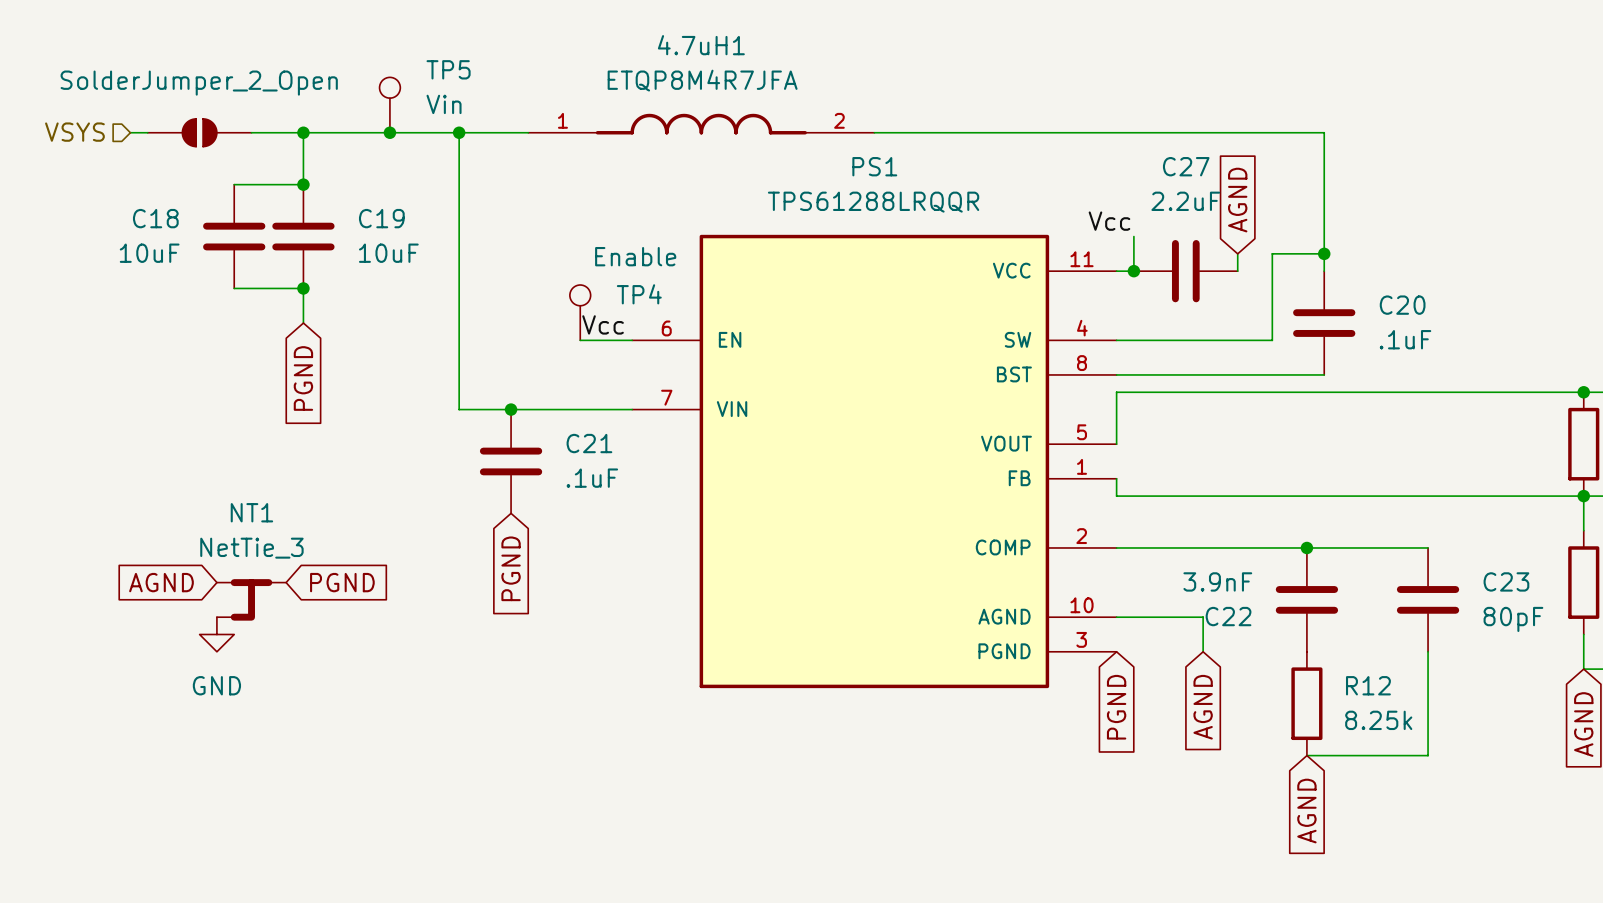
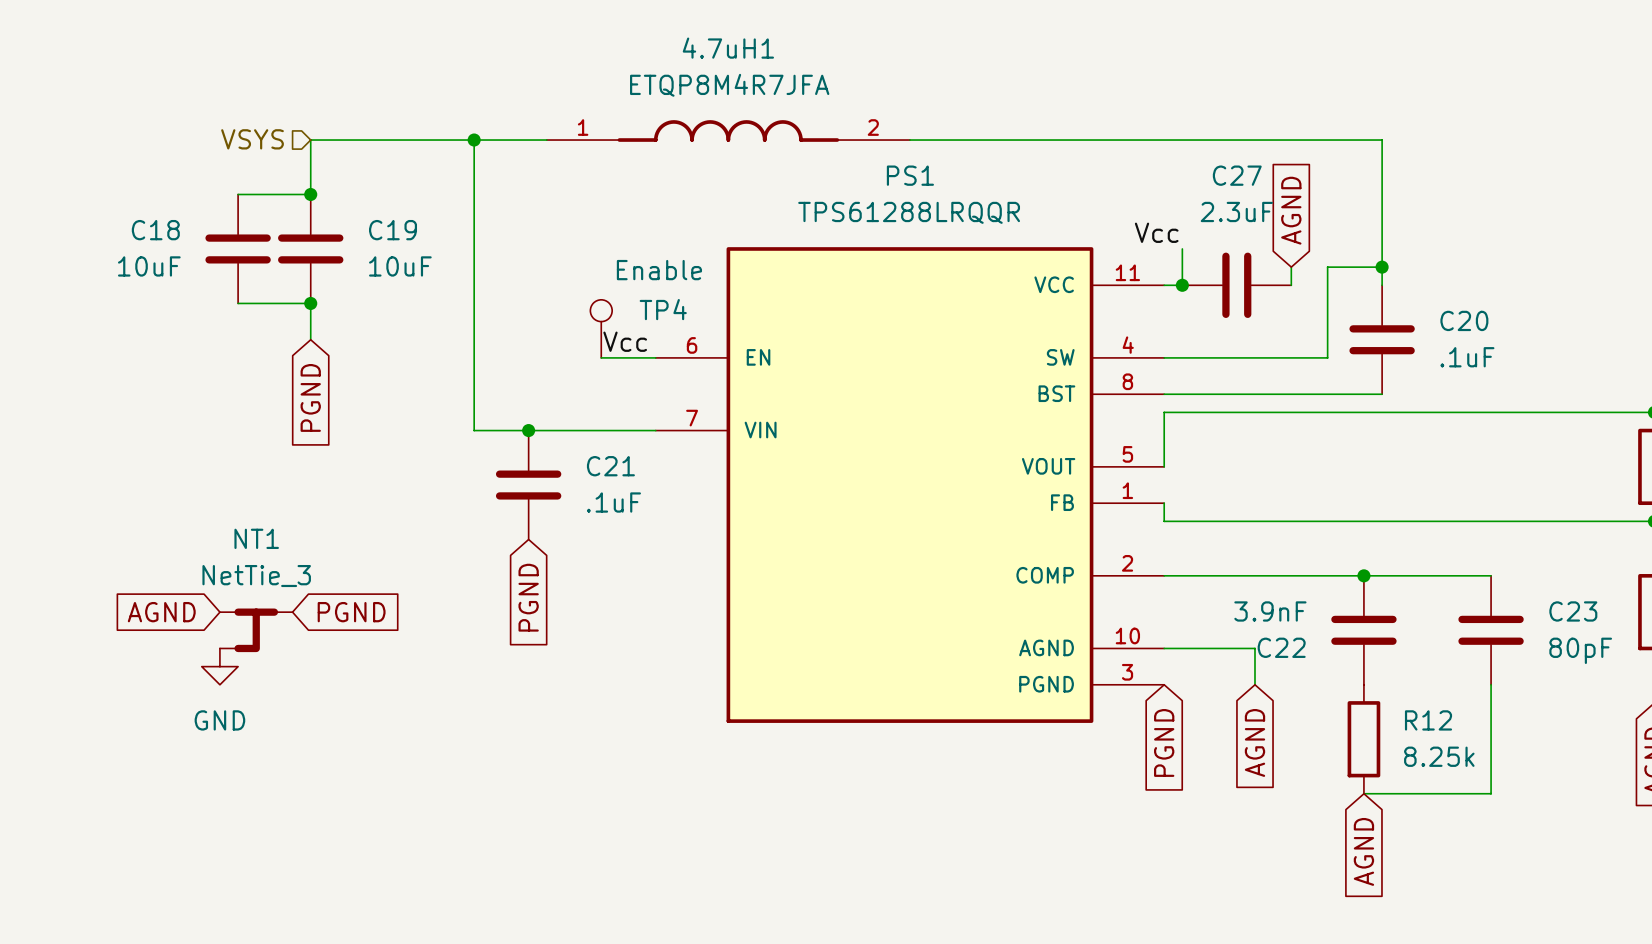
TP5: Vin (389, 105) -> none
hierarchical label position: VSYS (74, 132) -> VSYS (252, 139)
wire: (130, 132) (147, 132) -> none
part: SolderJumper_2_Open (199, 132) -> none
wire: (251, 132) (303, 132) -> none
junction: (303, 132) -> none
junction: (389, 132) -> none
C27 value: 2.2uF (1185, 201) -> 2.3uF (1236, 211)

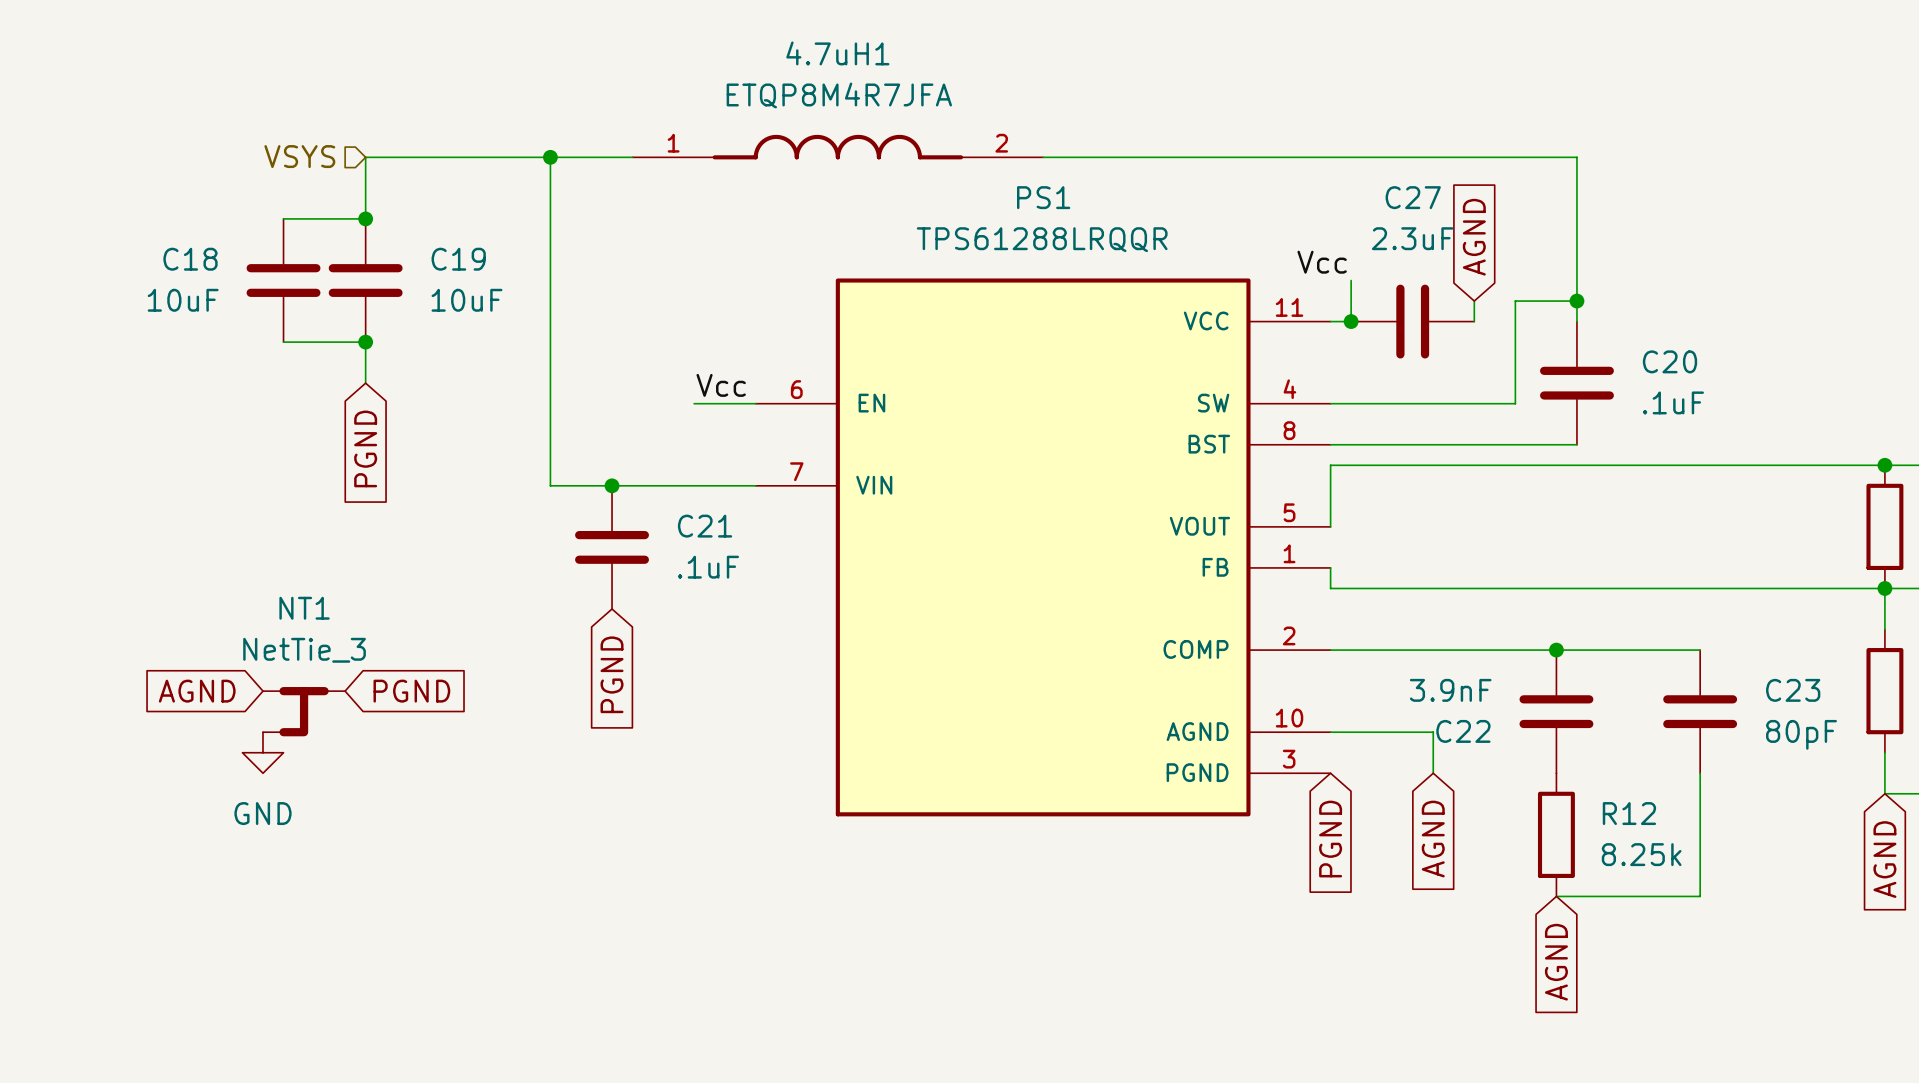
TP4: Enable (601, 328) -> none

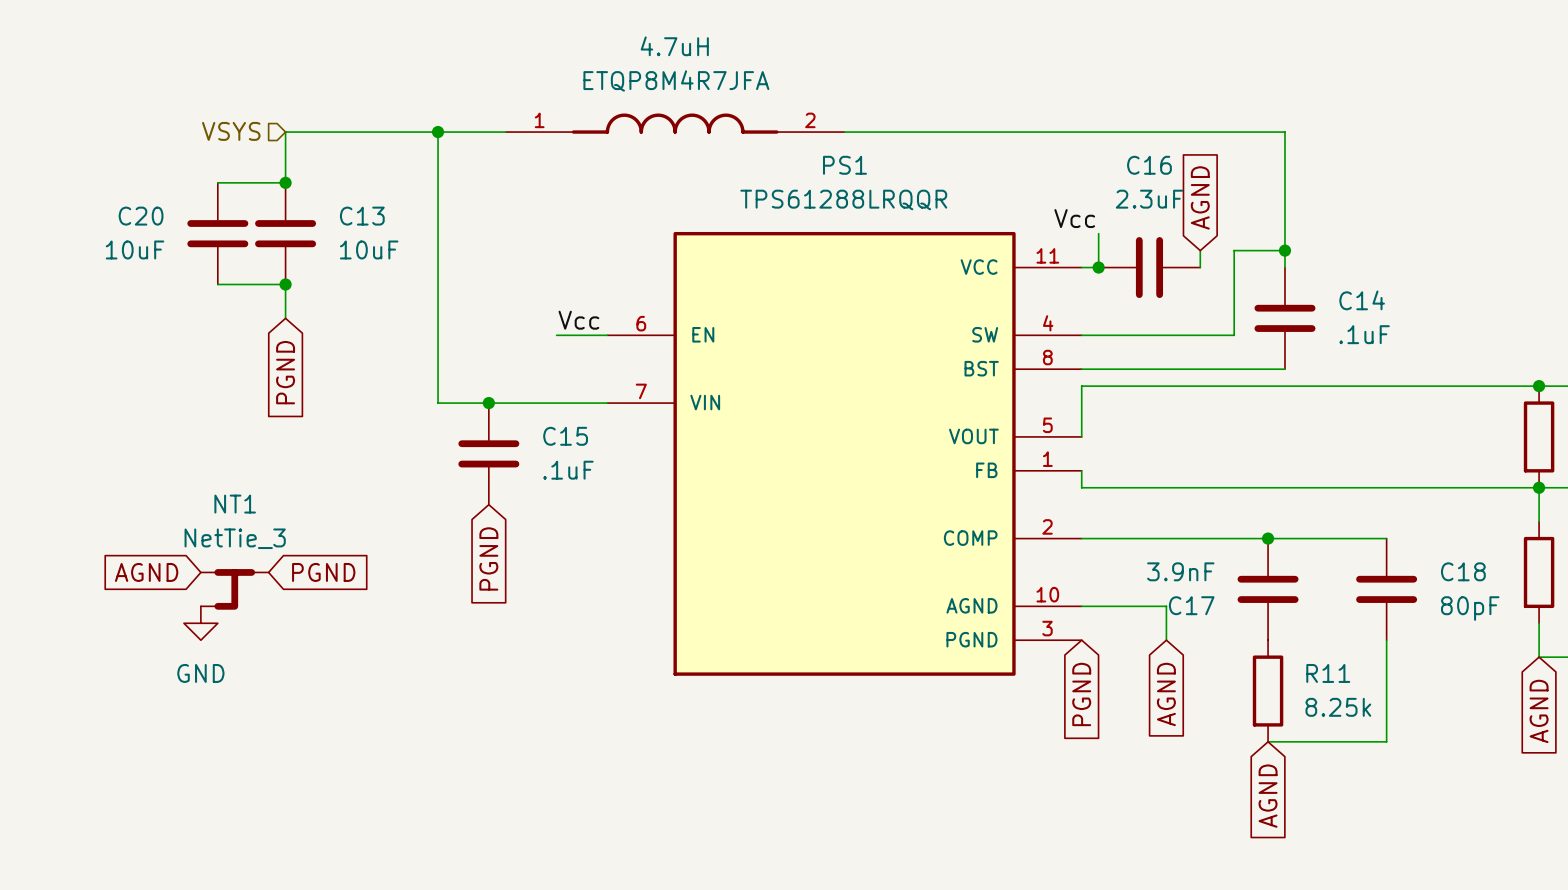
4.7uH1 name: 4.7uH1 (837, 53) -> 4.7uH (674, 46)
C27 name: C27 (1413, 197) -> C16 (1149, 165)
C18 name: C18 (190, 259) -> C20 (141, 216)
C19 name: C19 (458, 259) -> C13 (362, 216)
C20 name: C20 (1670, 361) -> C14 (1362, 300)
C21 name: C21 (705, 526) -> C15 (565, 436)
C23 name: C23 (1793, 690) -> C18 (1463, 571)
C22 name: C22 (1463, 731) -> C17 (1191, 605)
R12 name: R12 (1629, 813) -> R11 (1328, 673)

